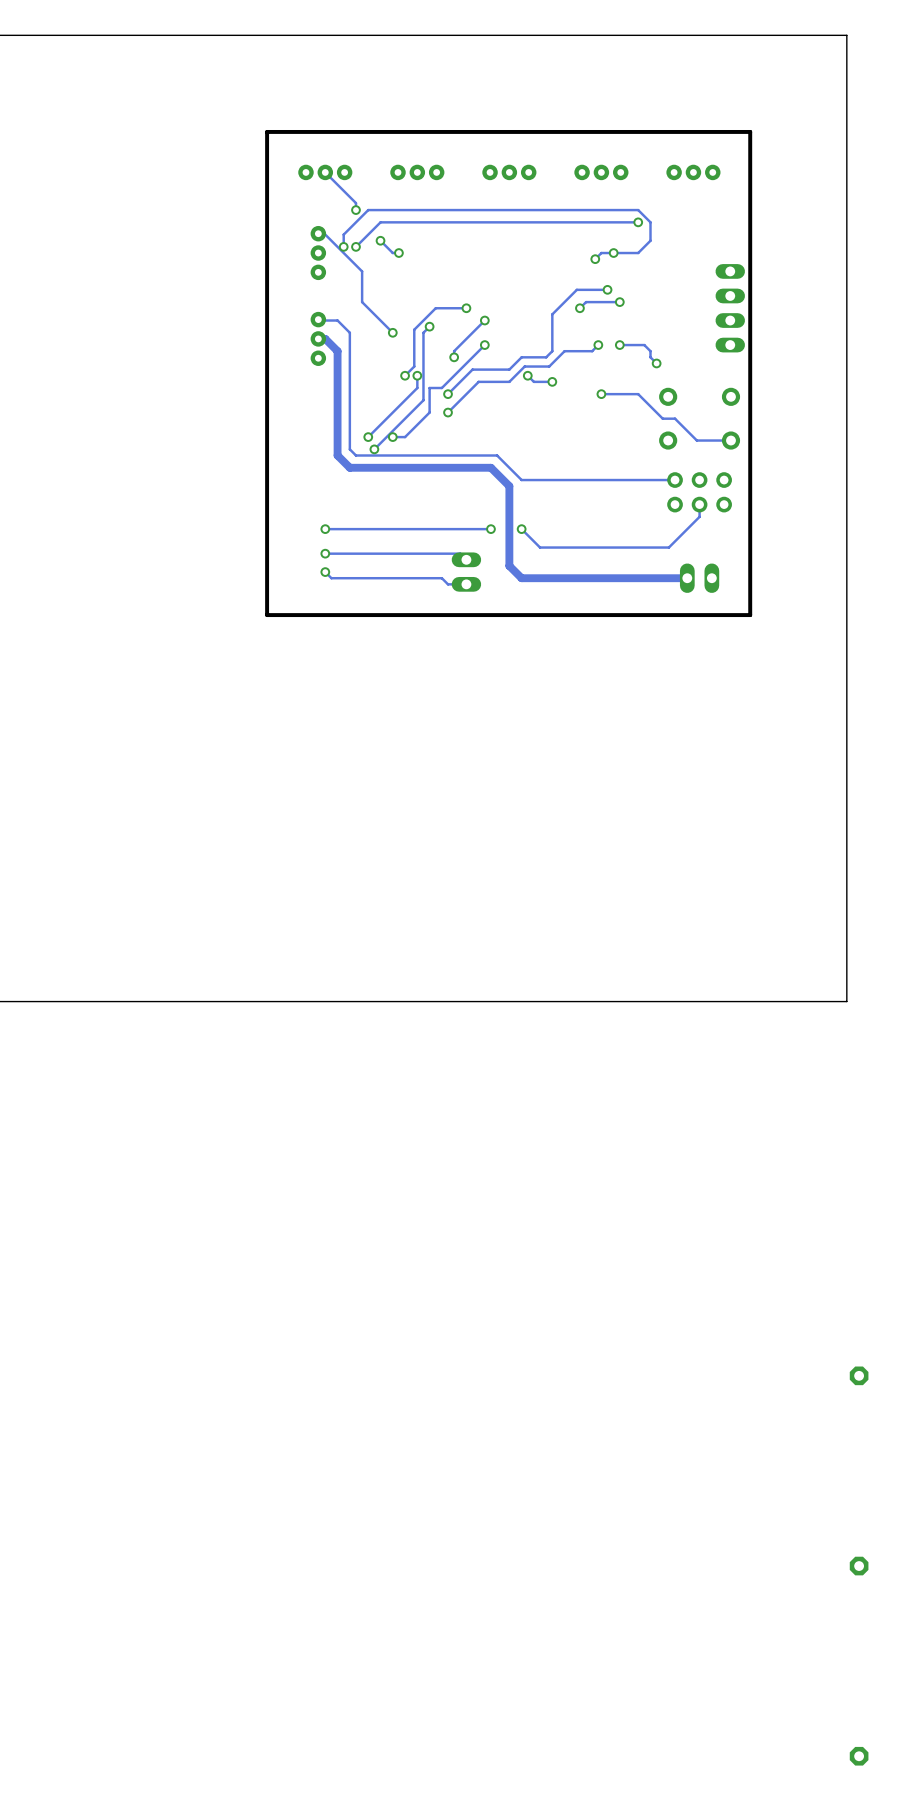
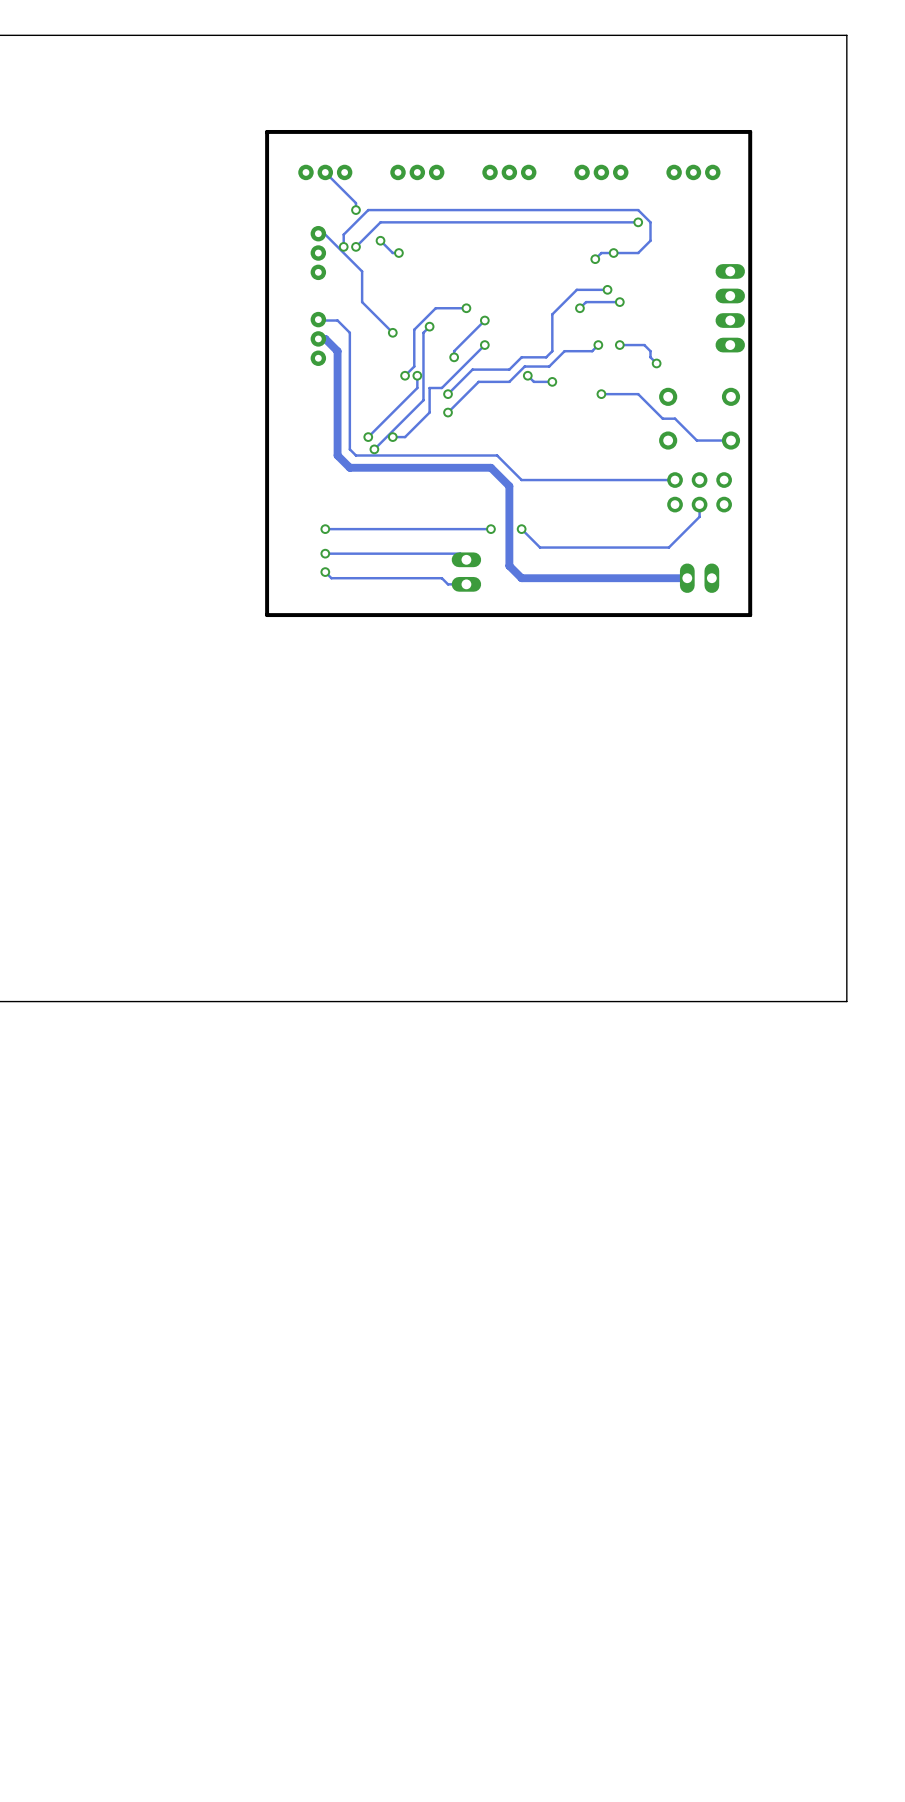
part: (859, 1375) -> none
part: (859, 1566) -> none
part: (859, 1756) -> none

